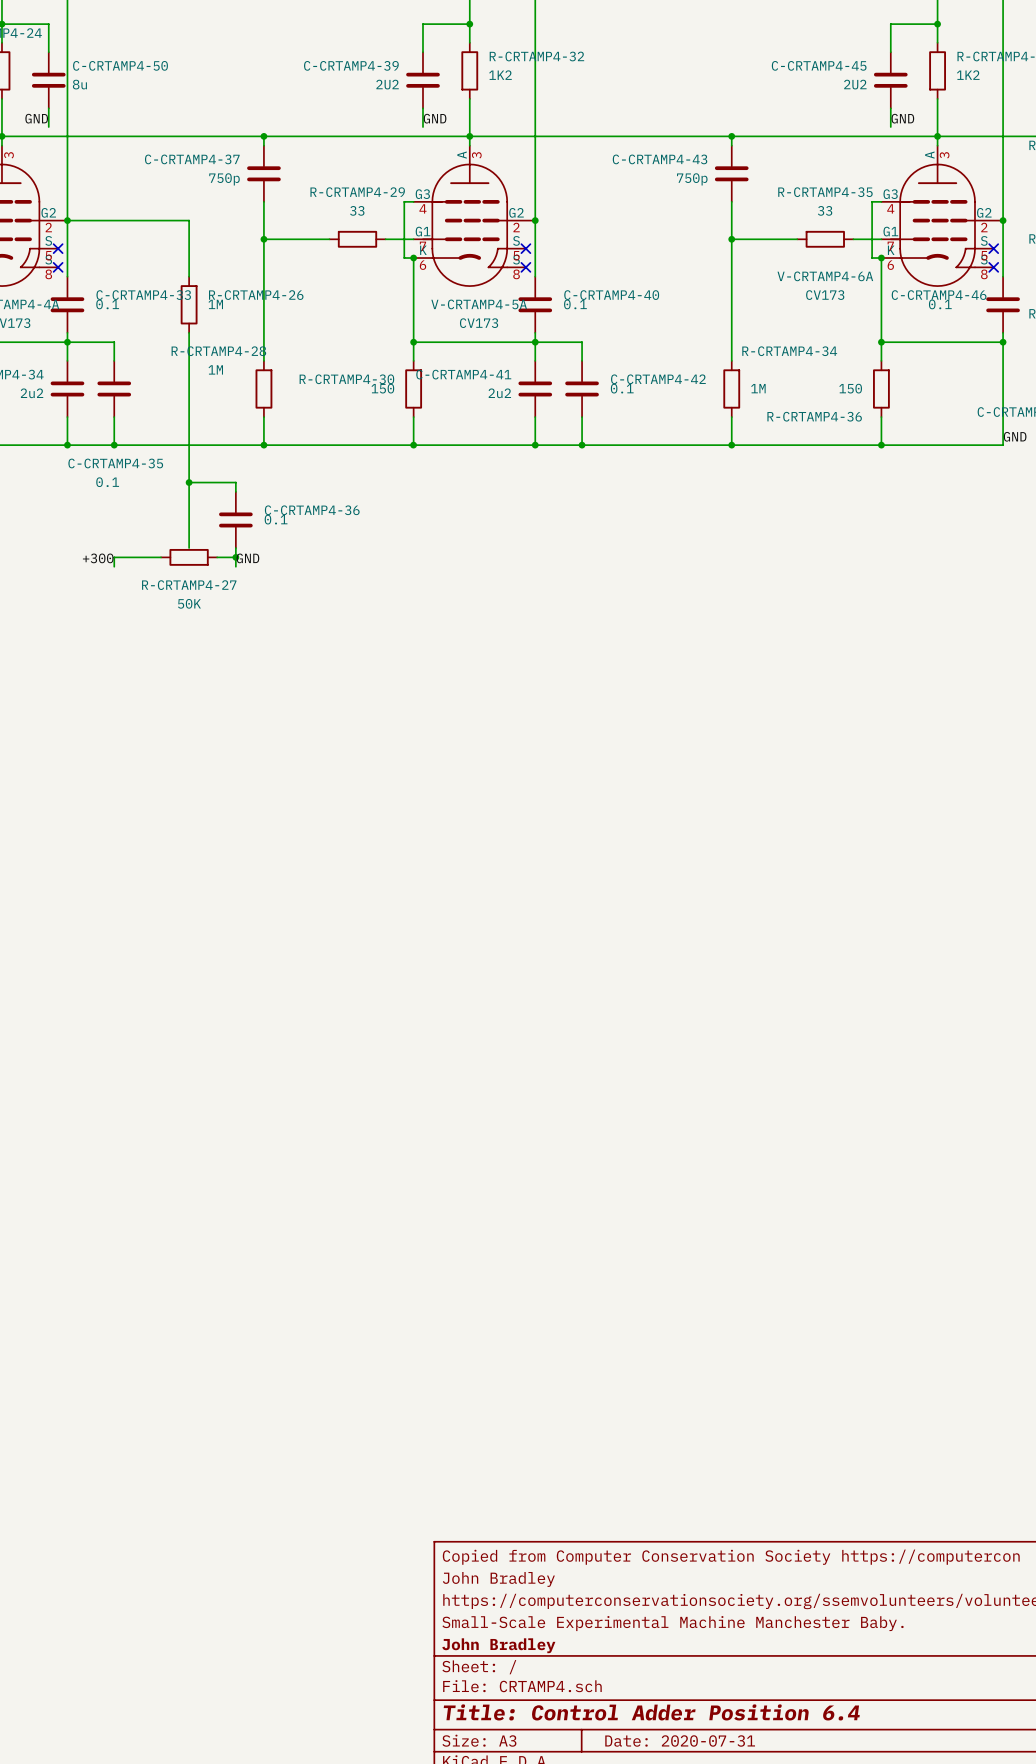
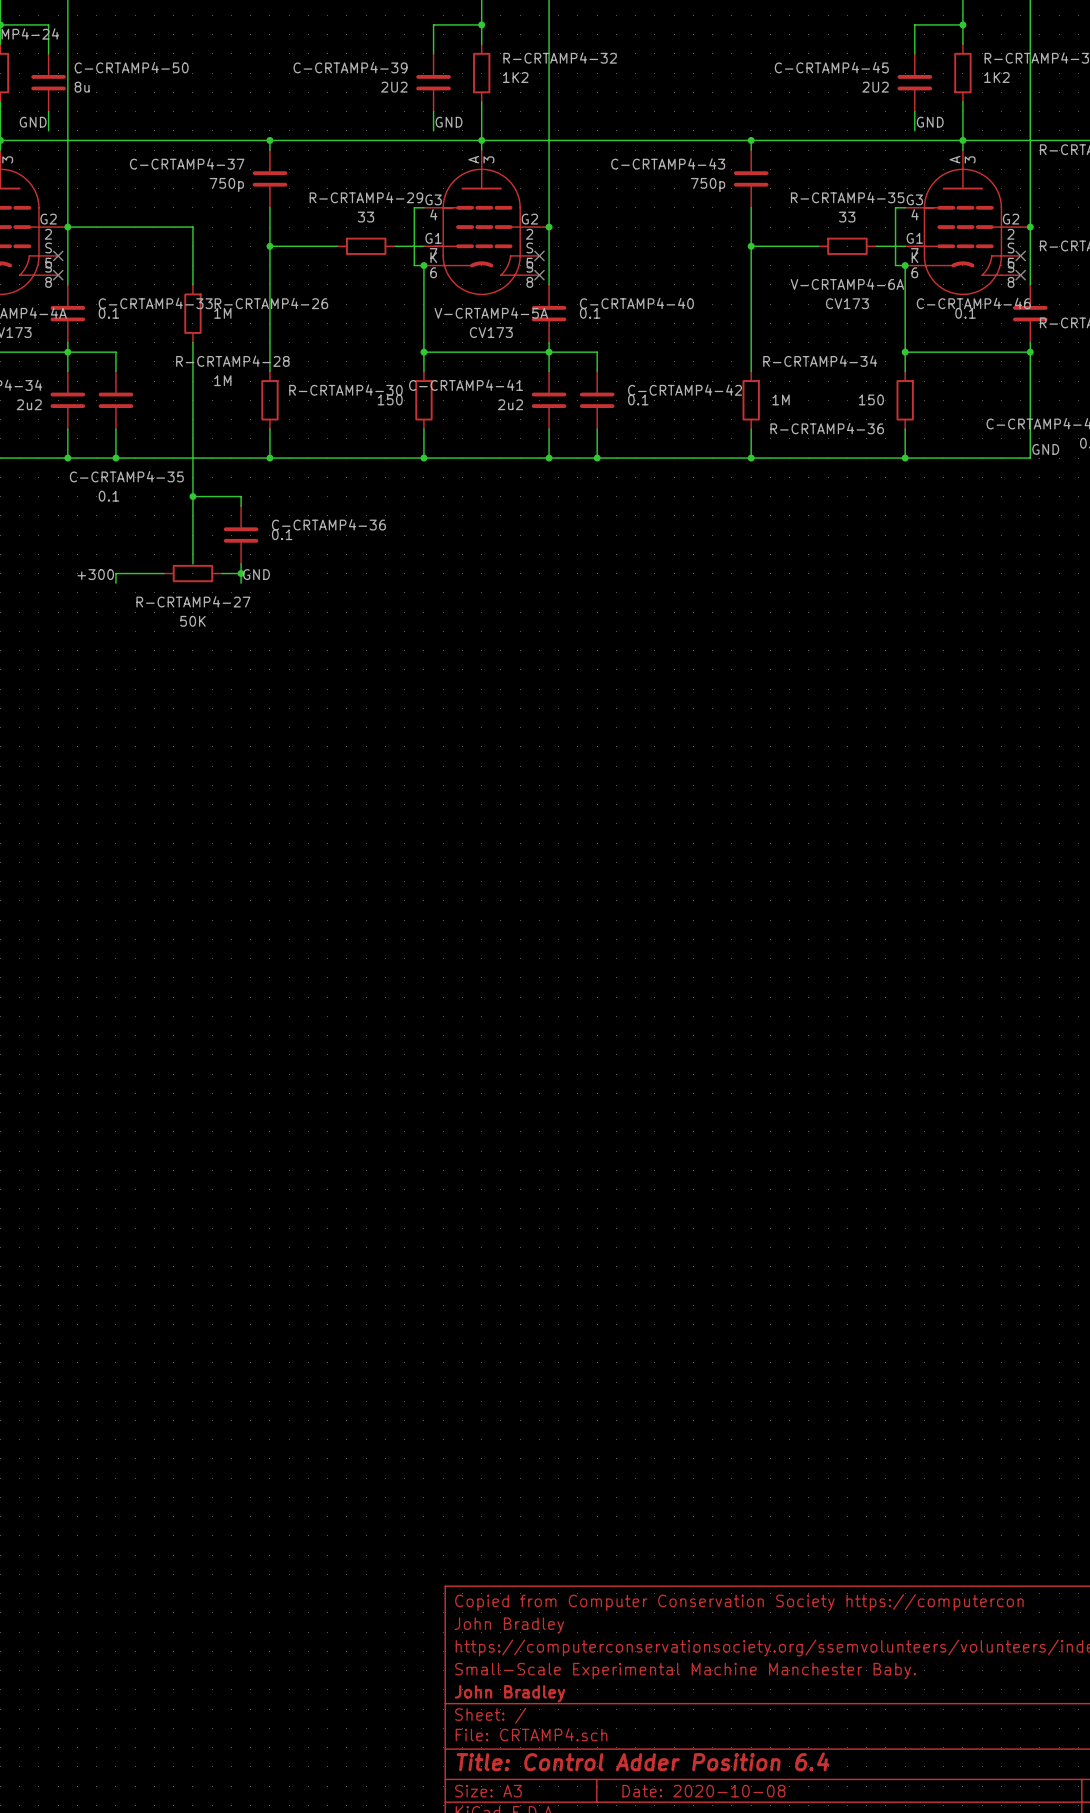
title block: Date: 2020-07-31 (680, 1740) -> Date: 2020-10-08 (703, 1791)

